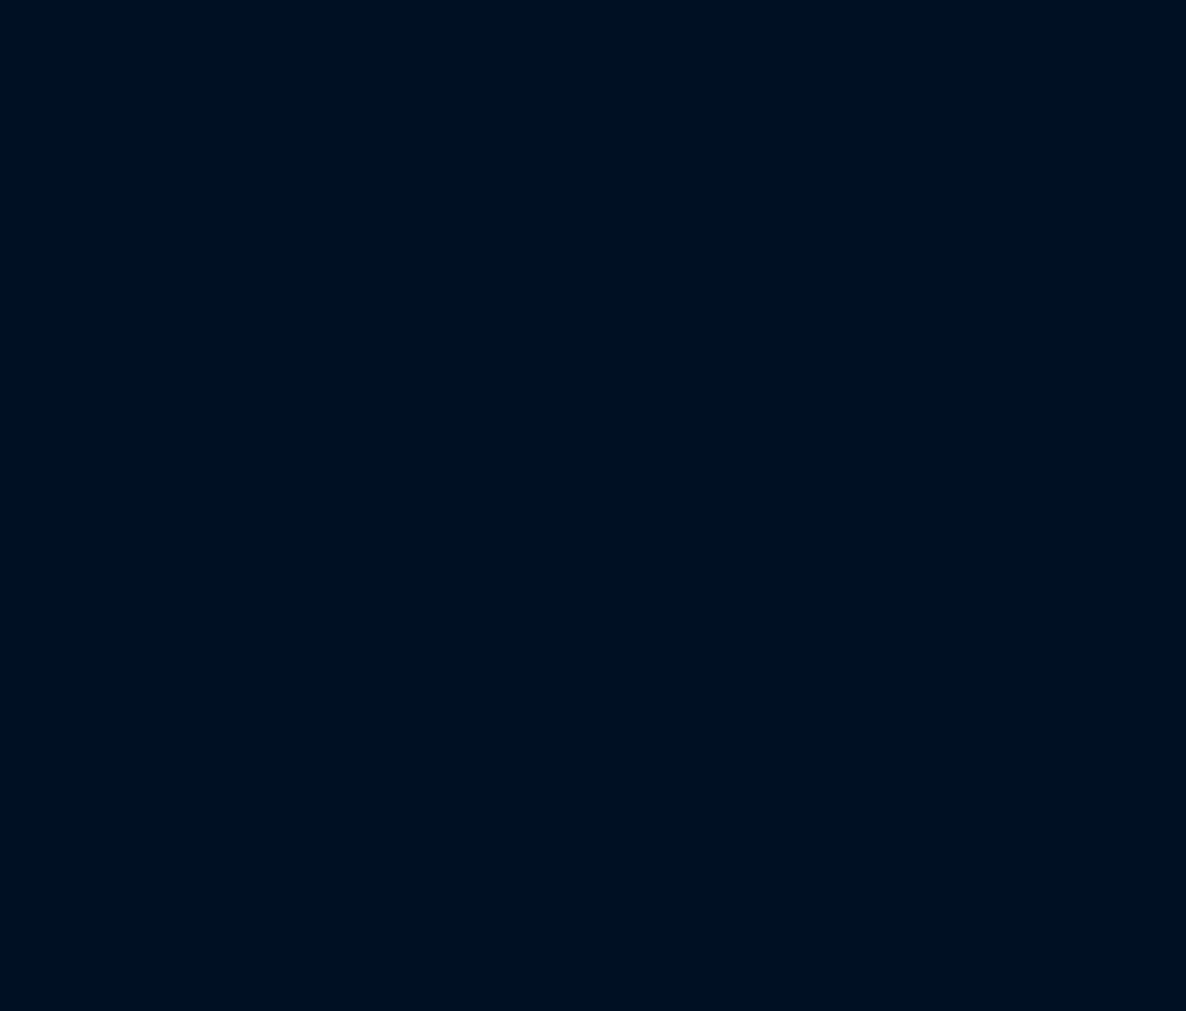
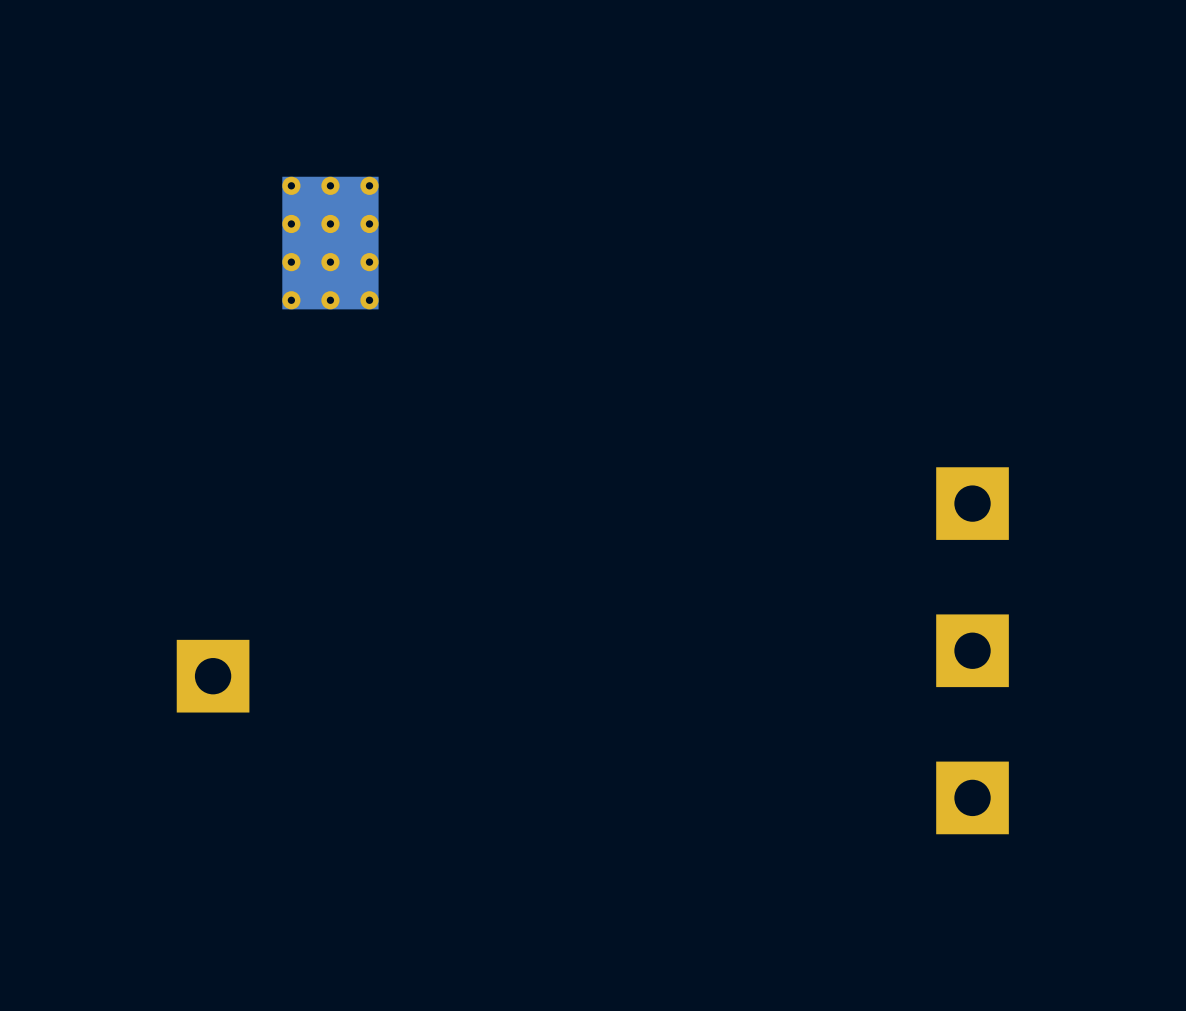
part: none -> (330, 243)
part: none -> (972, 503)
part: none -> (972, 650)
part: none -> (213, 676)
part: none -> (972, 797)

